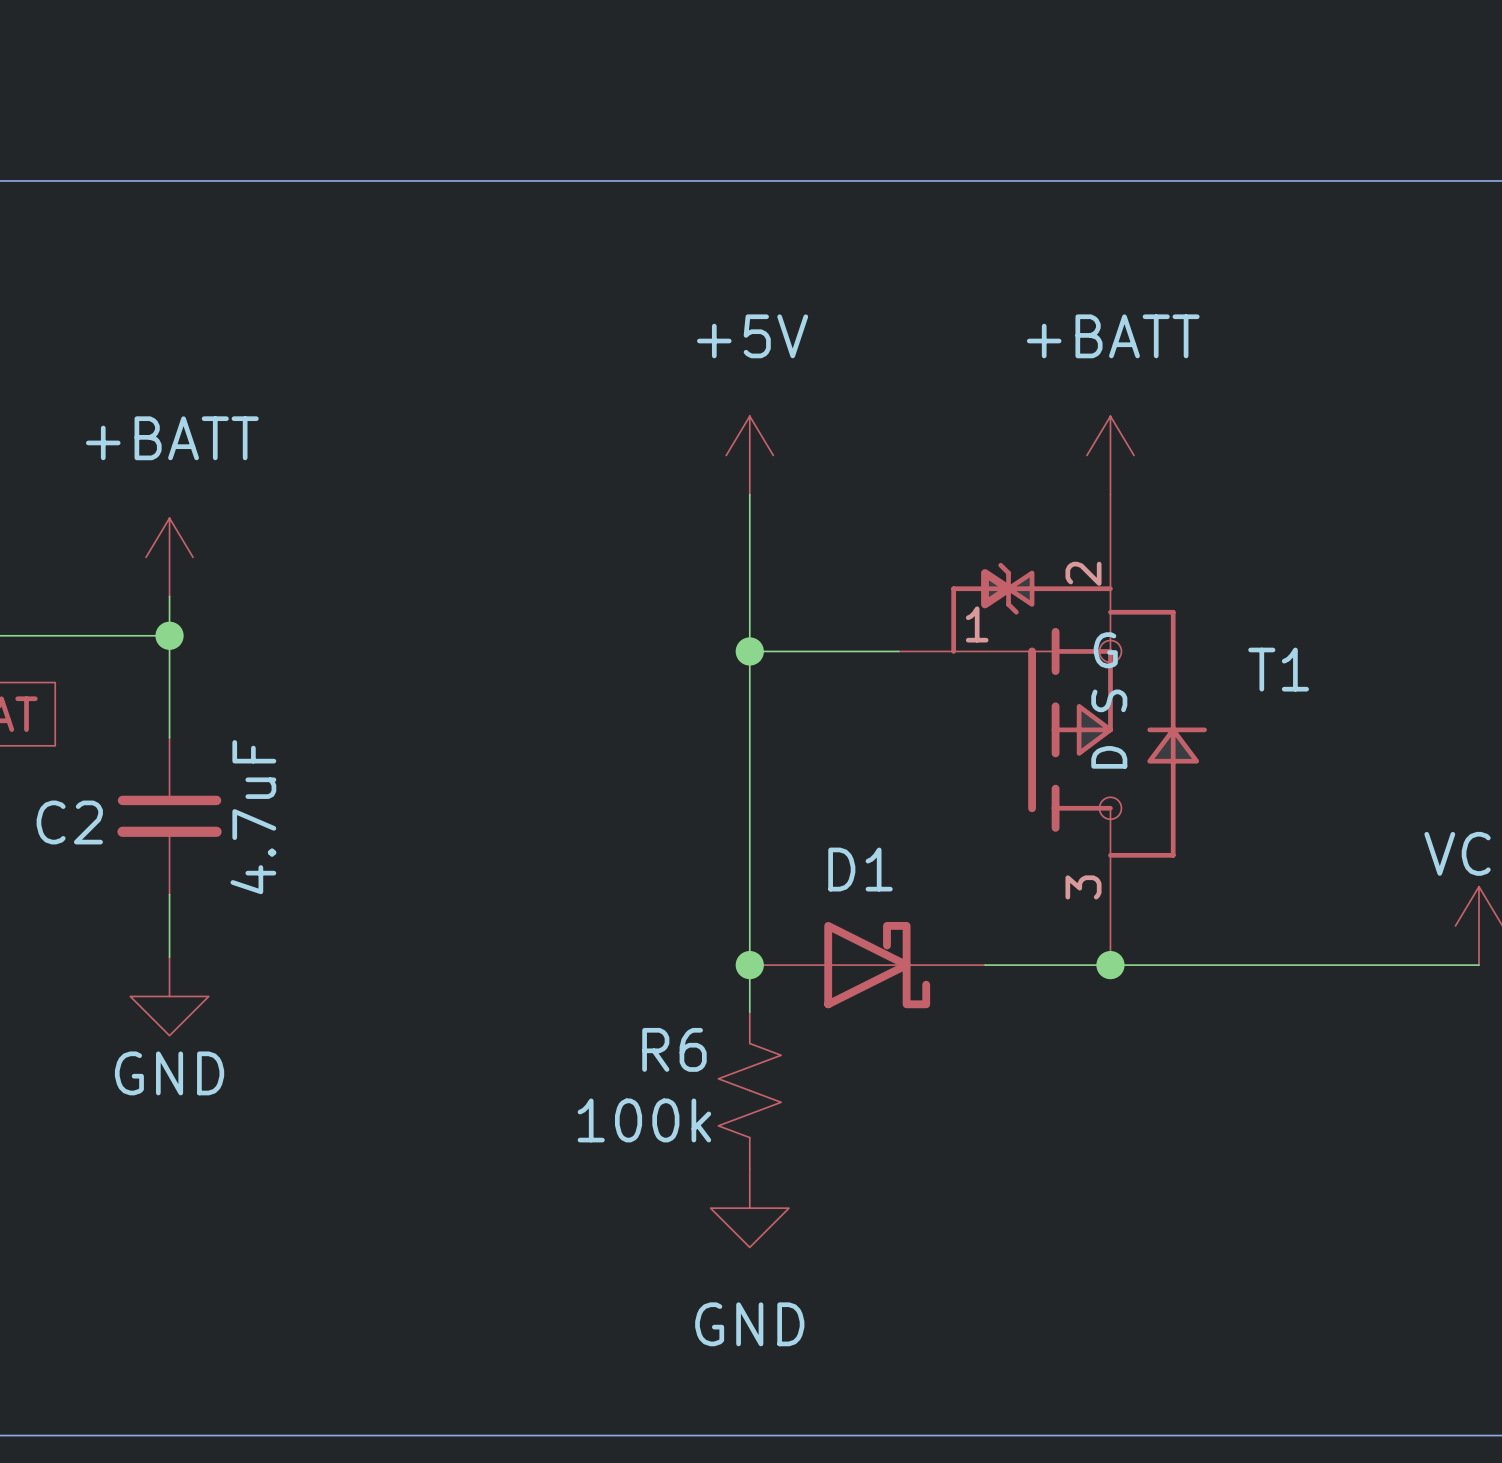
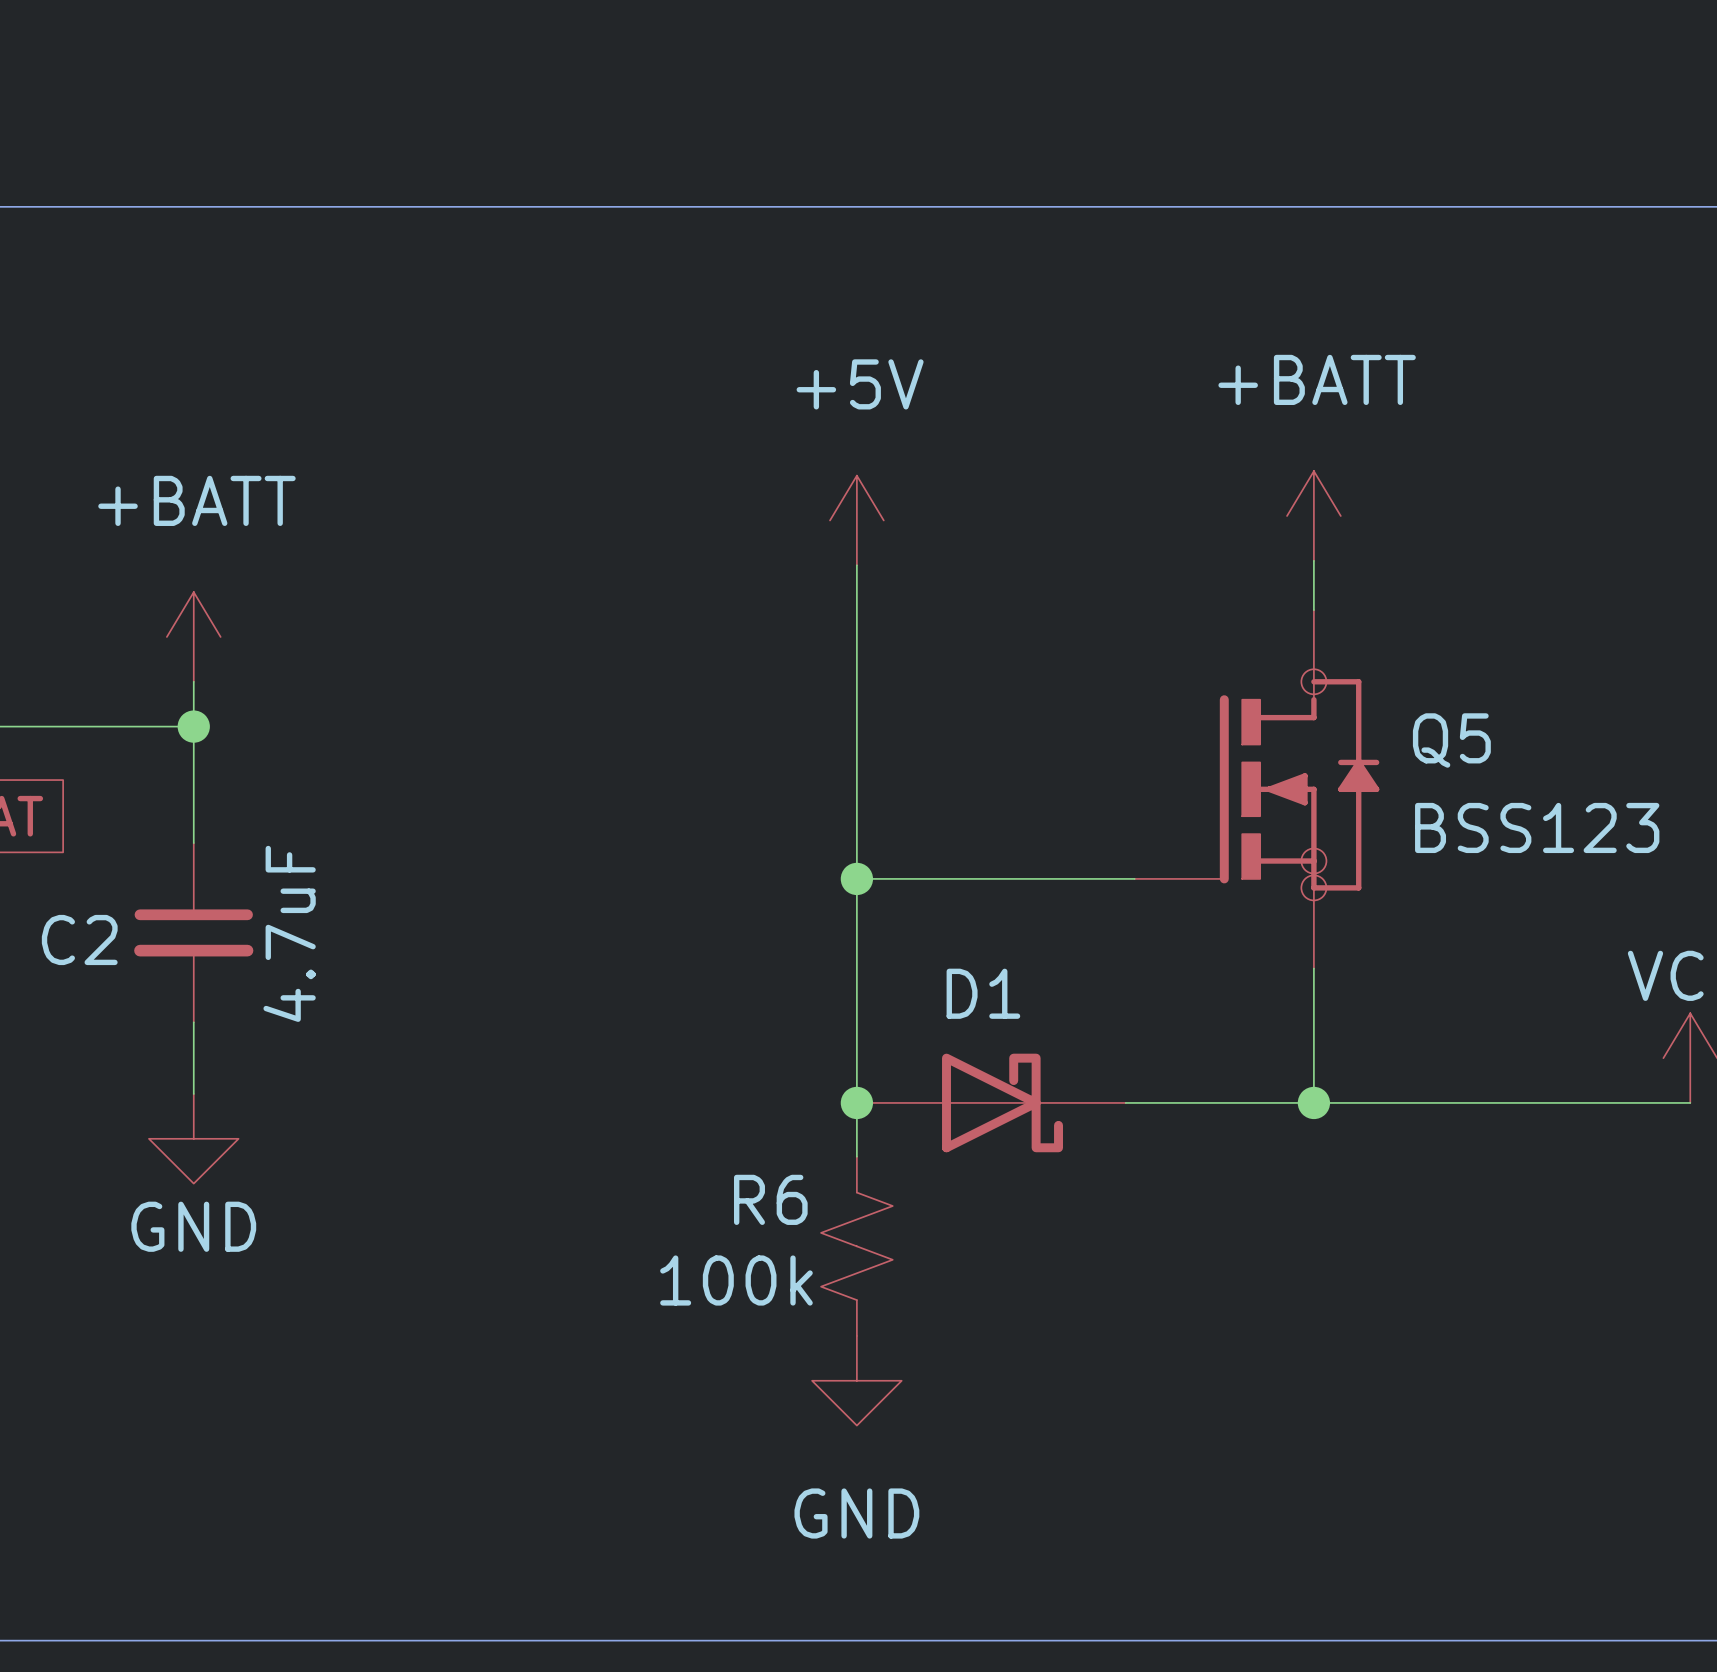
power symbol position: +BATT (1110, 455) -> +BATT (1313, 516)
wire: none -> (1313, 560) (1313, 610)
wire: (749, 651) (898, 651) -> none
junction position: (749, 651) -> (856, 878)
Q5: none -> BSS123 (1257, 789)
T1: (1052, 729) -> none
wire: none -> (856, 878) (1134, 878)
wire: none -> (1313, 968) (1313, 1102)
junction position: (1110, 965) -> (1313, 1102)

